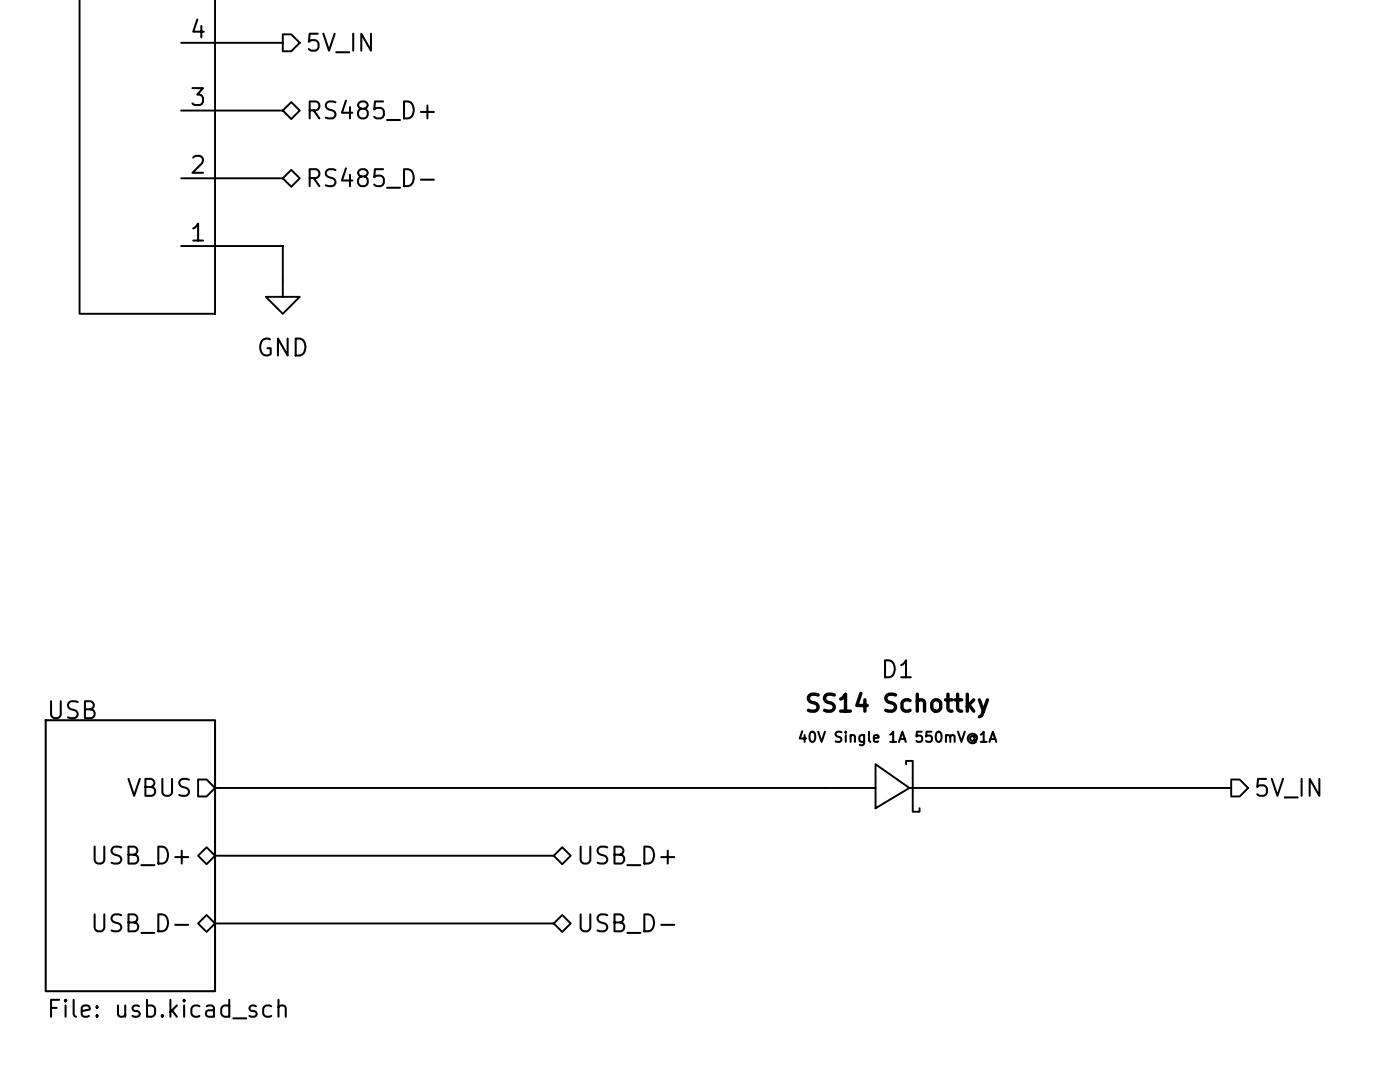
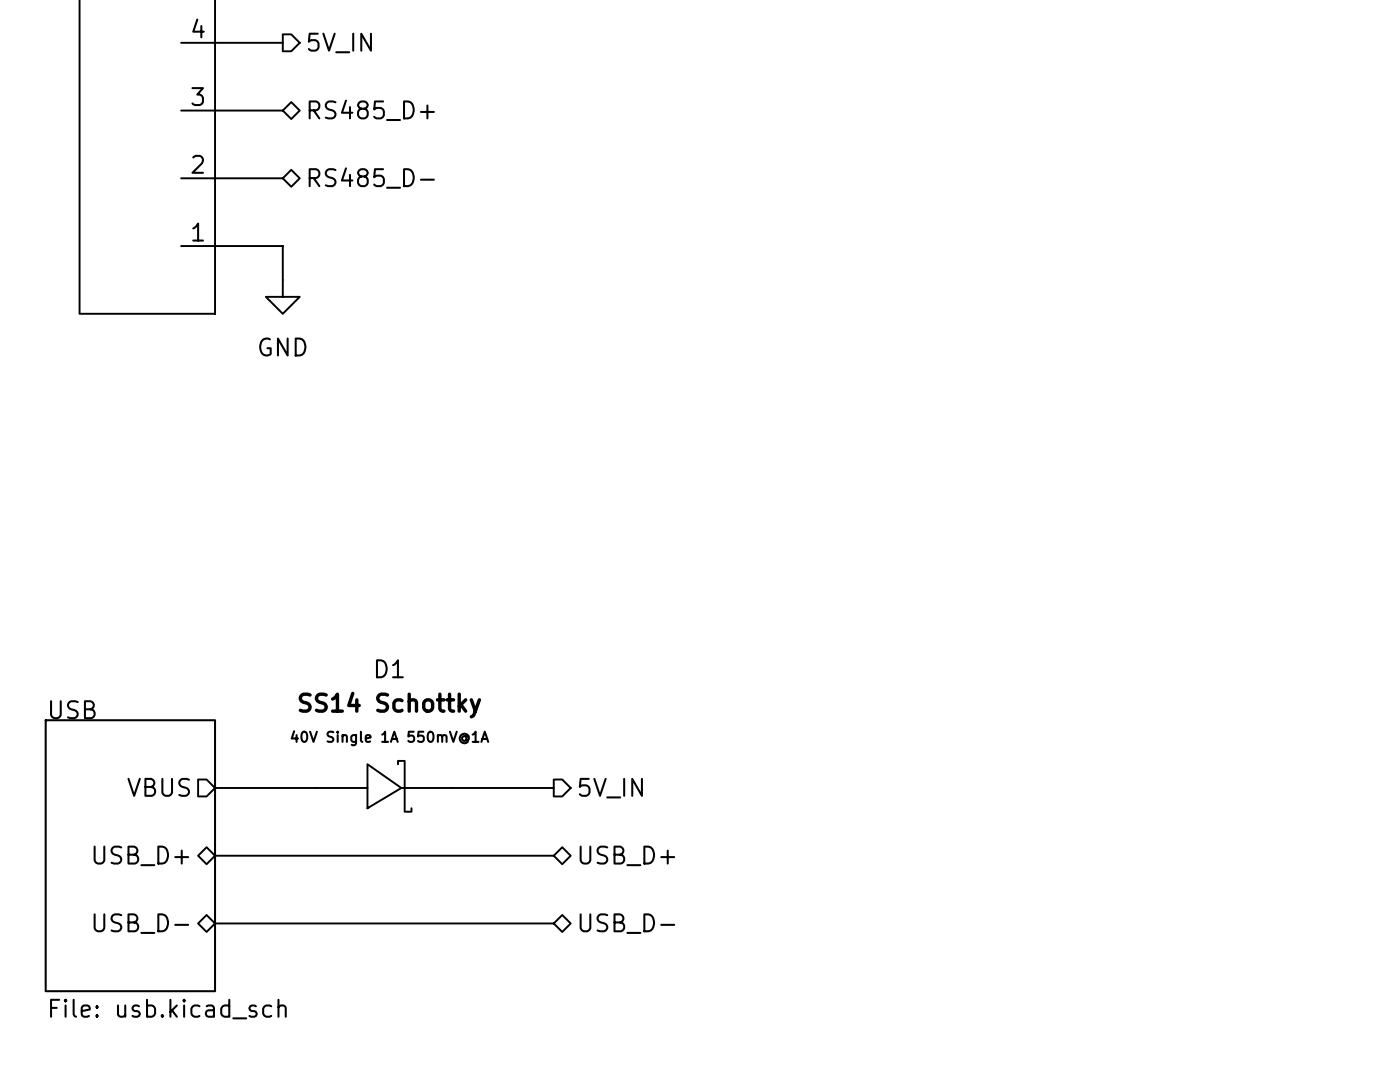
D1 position: (892, 786) -> (384, 786)
wire: (553, 787) (824, 787) -> none
wire: (960, 787) (1231, 787) -> none
hierarchical label: none -> 5V_IN (610, 788)
hierarchical label: 5V_IN (1288, 788) -> none

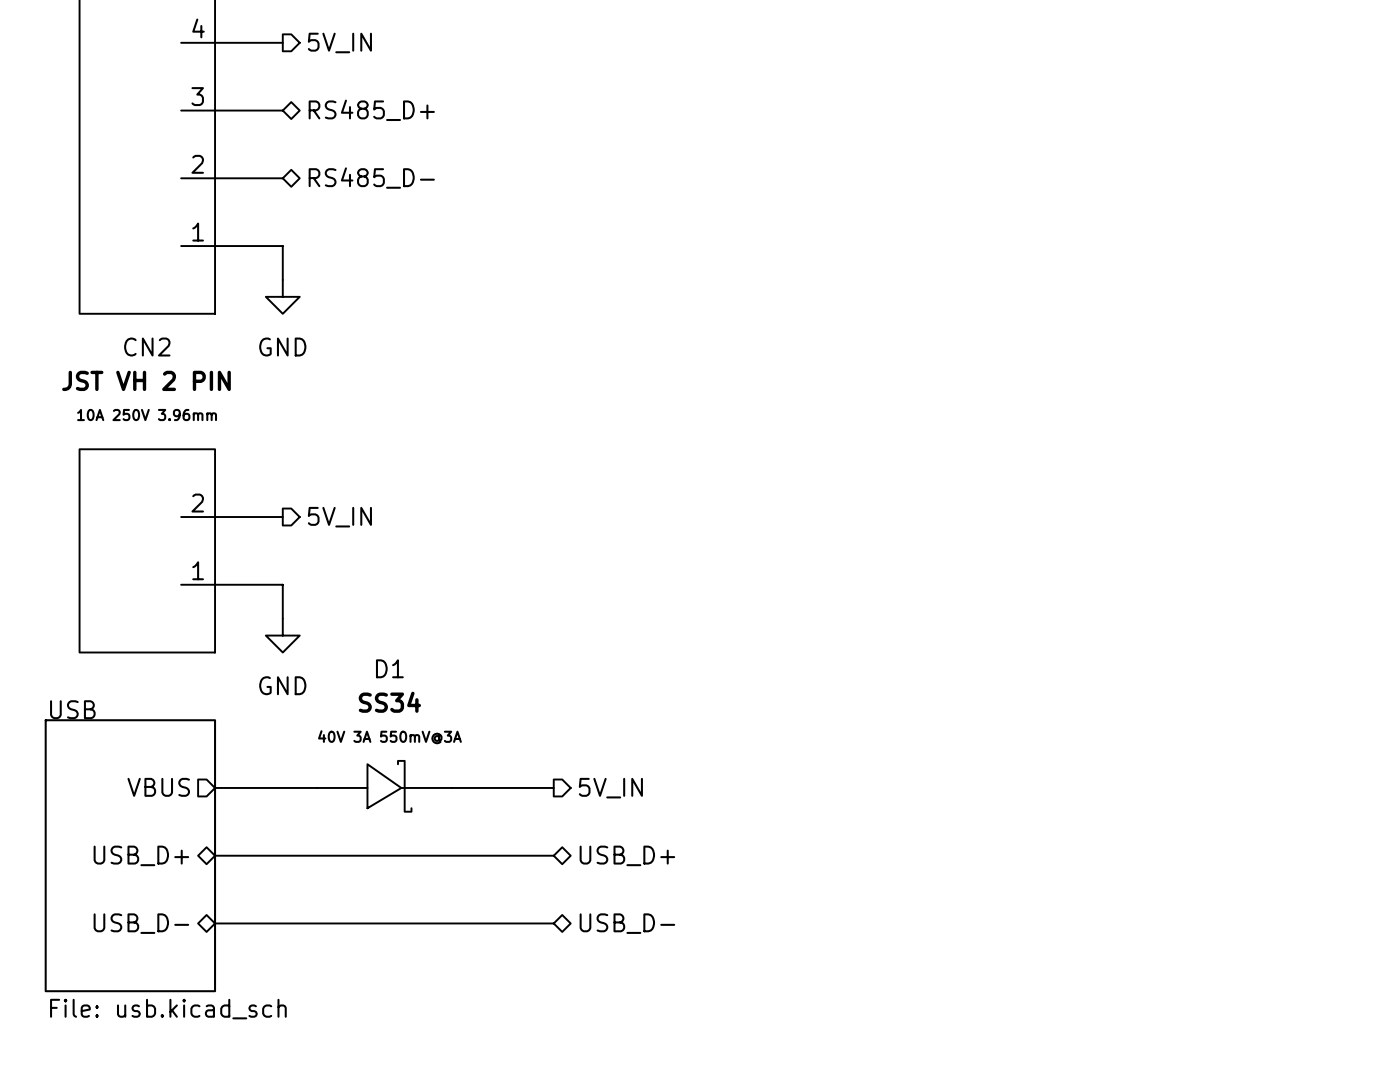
wire: none -> (215, 517) (282, 517)
hierarchical label: none -> 5V_IN (339, 517)
CN2: none -> JST VH 2 PIN (147, 550)
wire: none -> (215, 584) (282, 584) (282, 618)
power symbol: none -> GND (282, 635)
D1 value: SS14 Schottky (389, 705) -> SS34 (389, 702)
D1 text: 40V Single 1A 550mV@1A (389, 738) -> 40V 3A 550mV@3A (389, 737)

